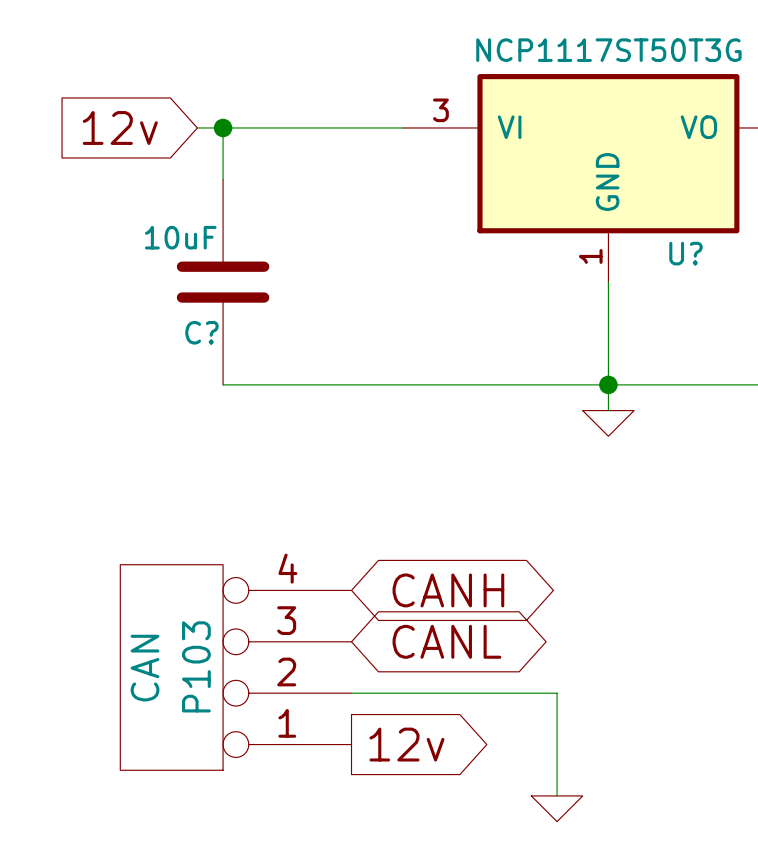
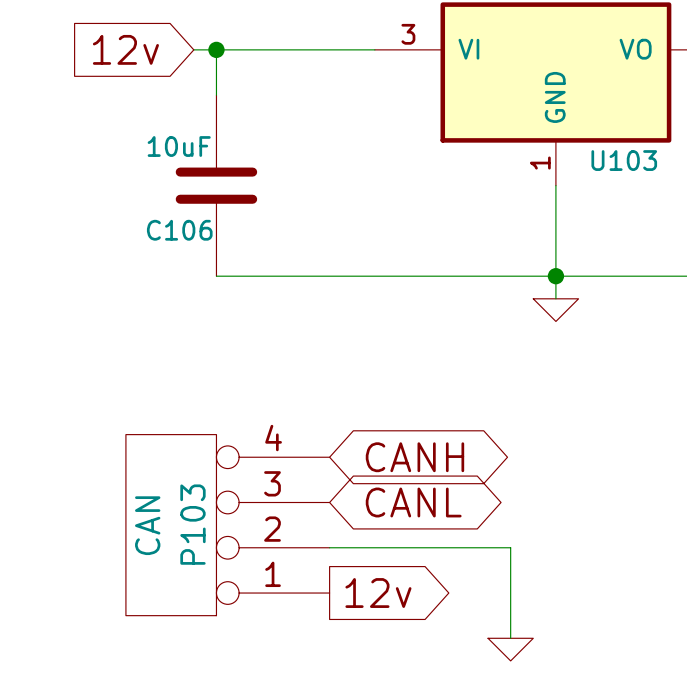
U? name: U? (685, 253) -> U103 (624, 160)
C? name: C? (201, 332) -> C106 (179, 230)

